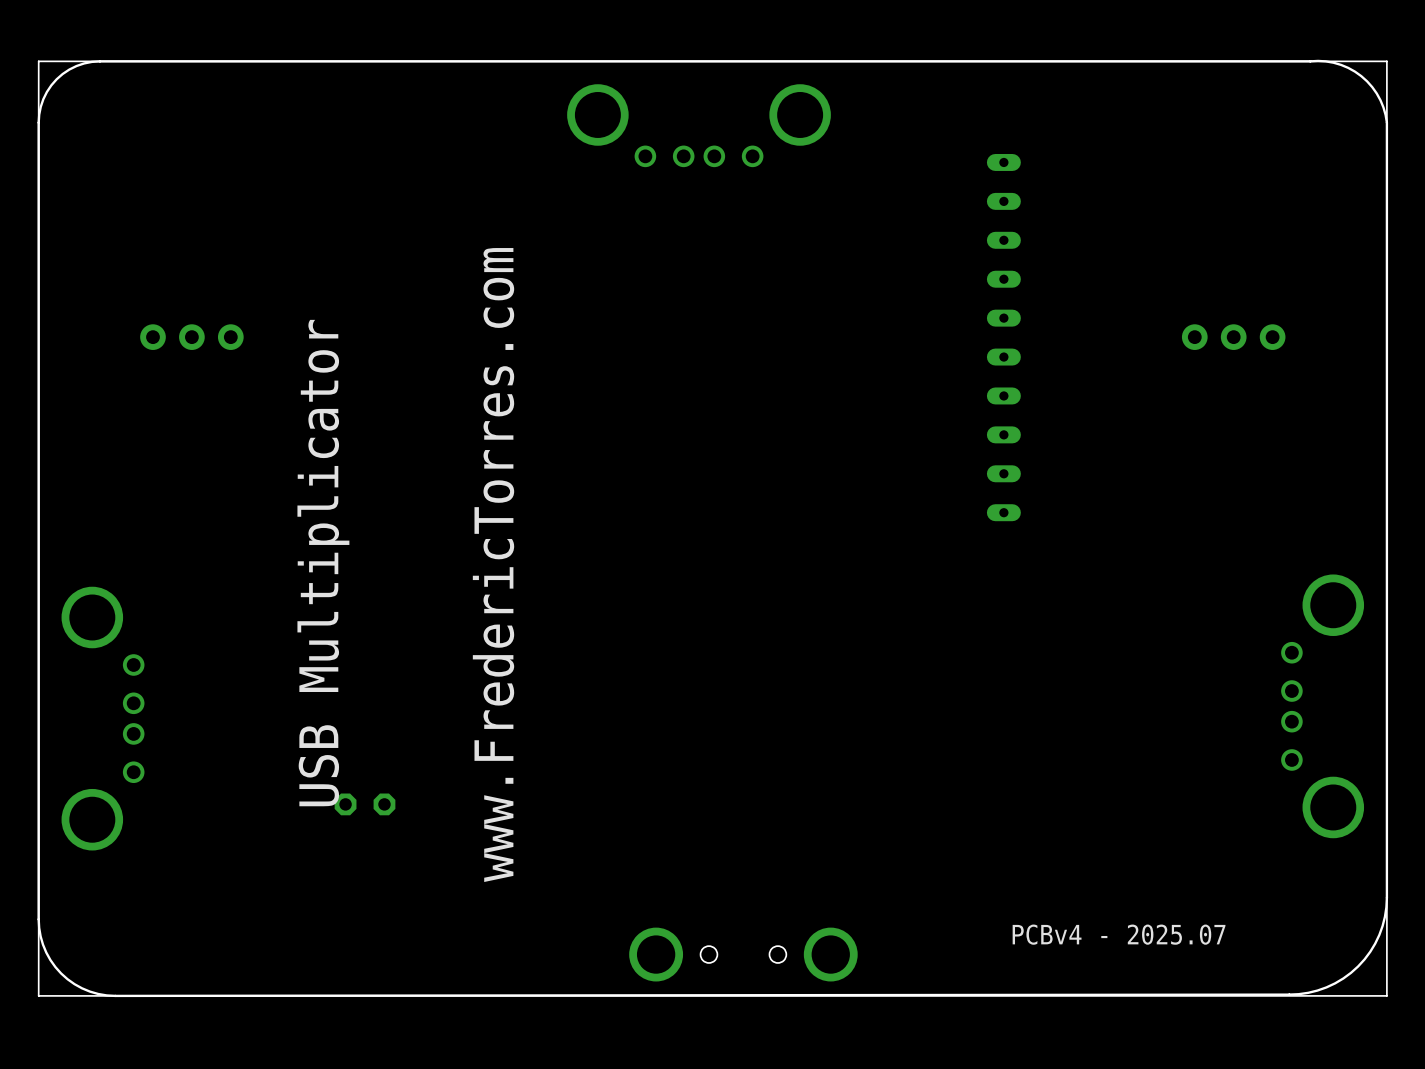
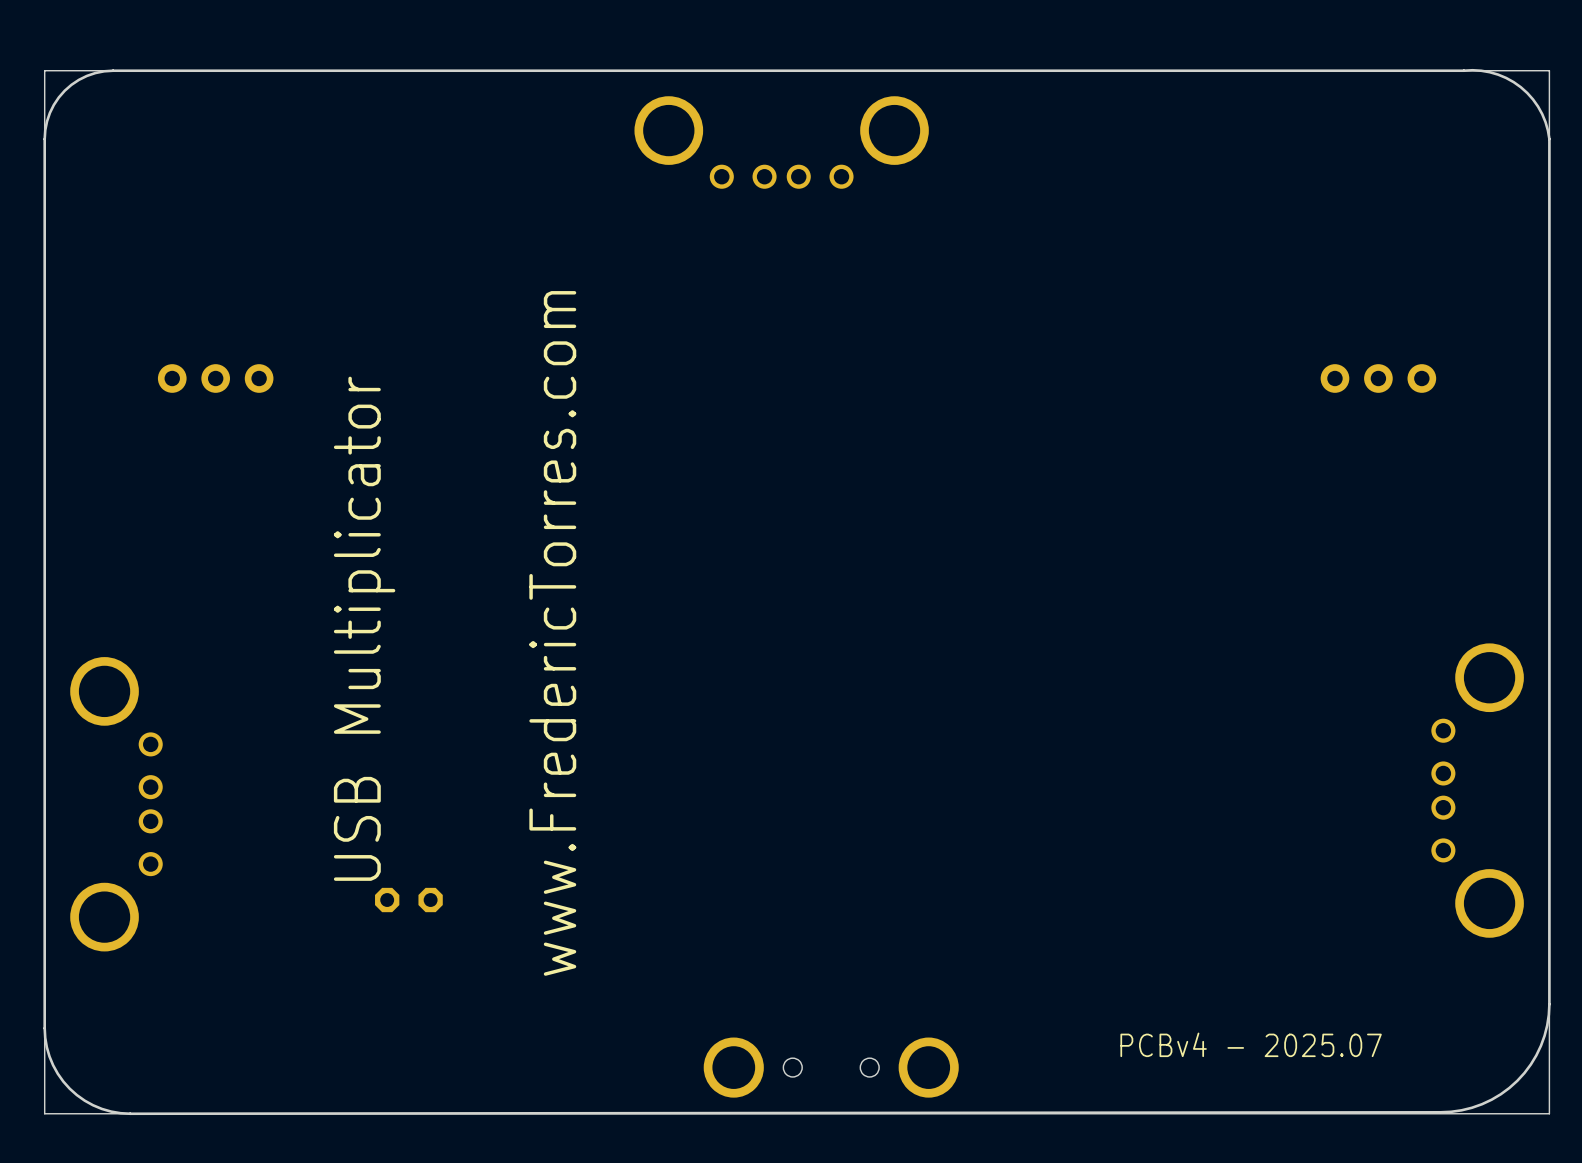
part: (1003, 337) -> none

